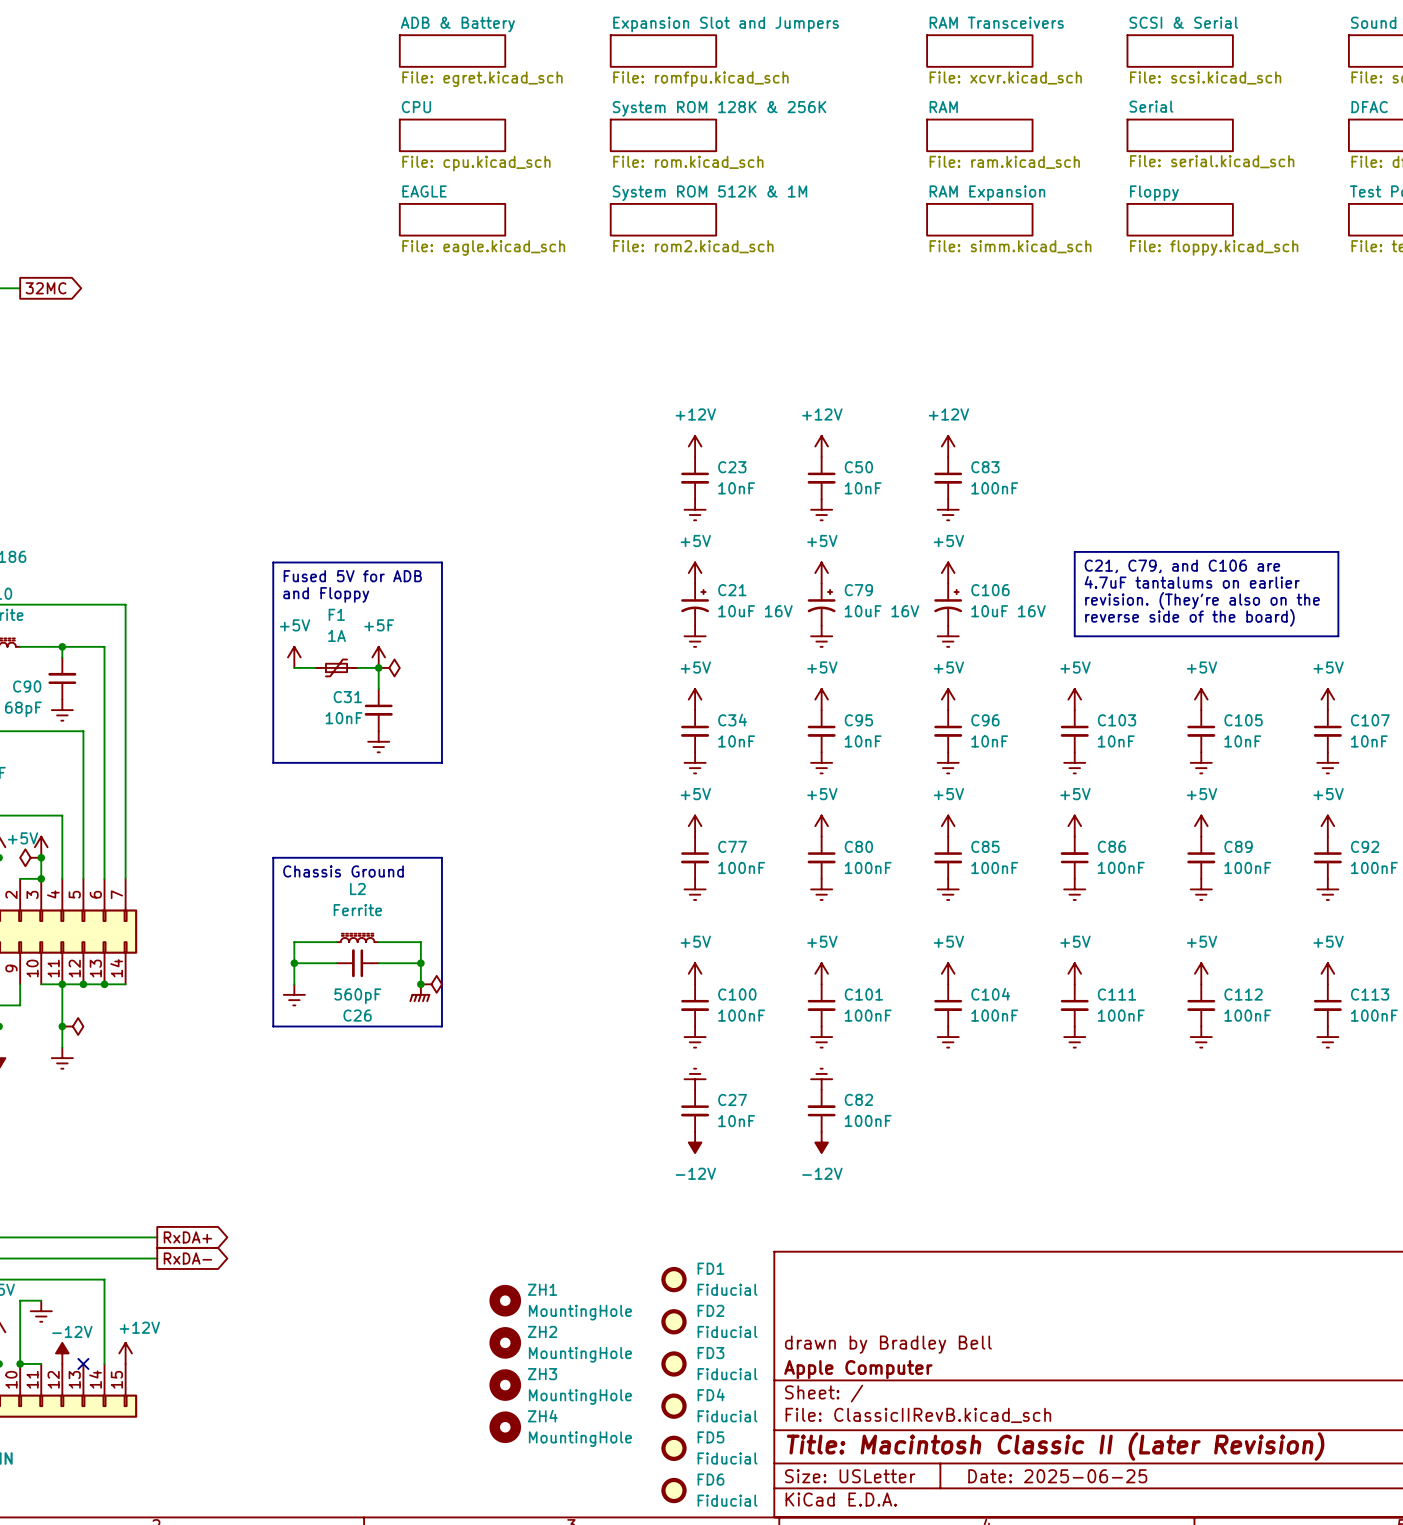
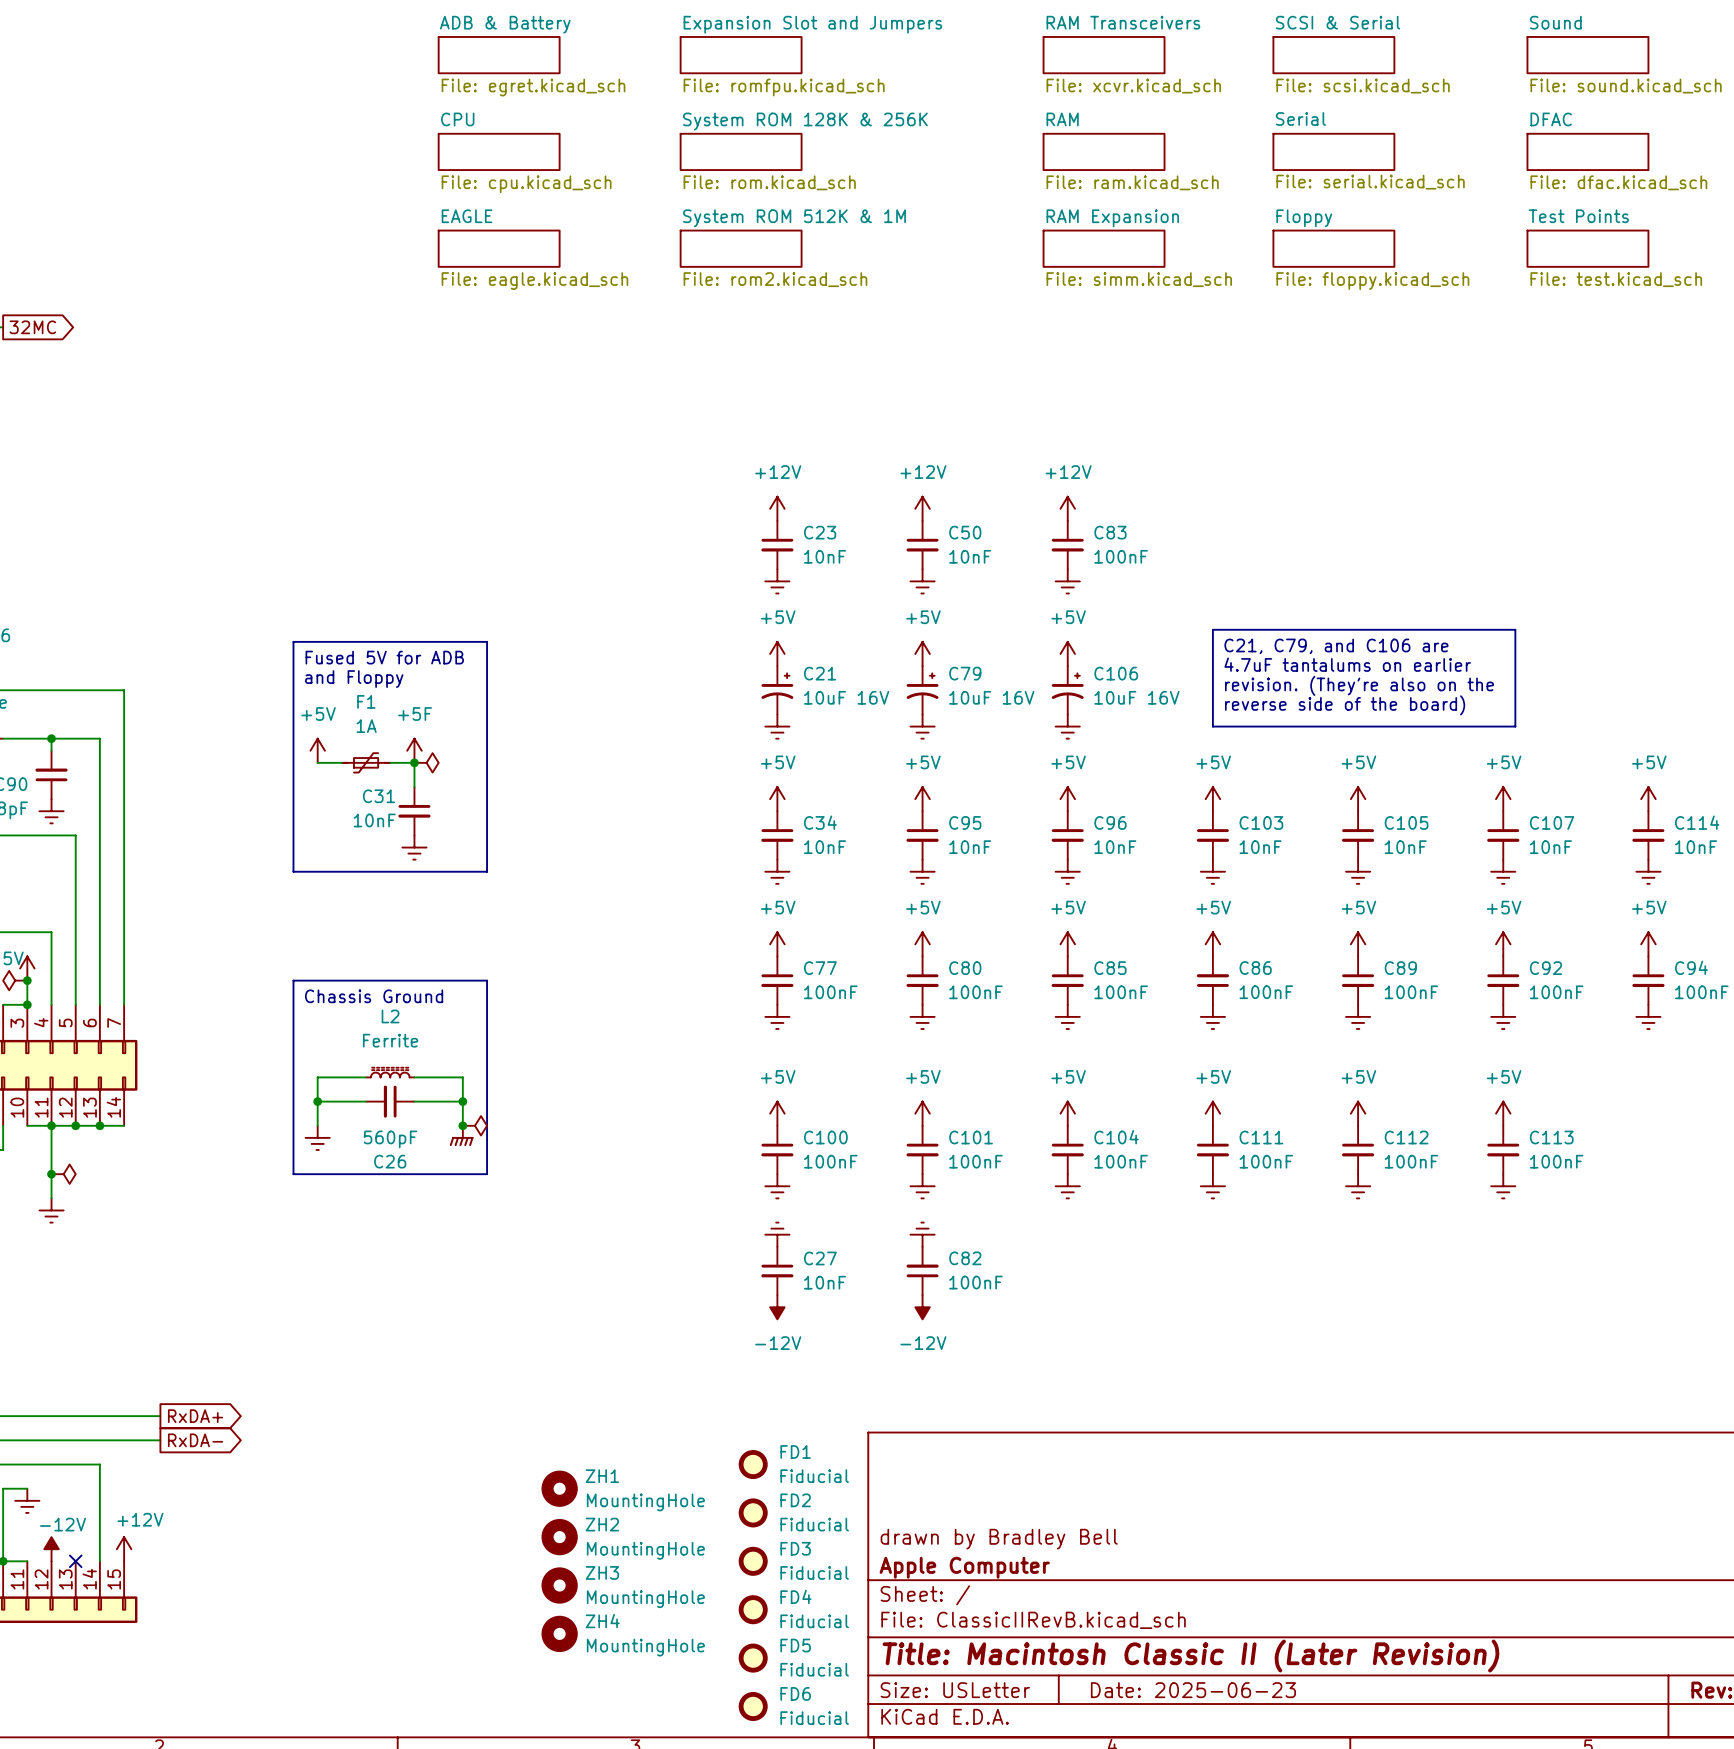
title block: Date: 2025-06-25 (1057, 1476) -> Date: 2025-06-23 (1193, 1690)

